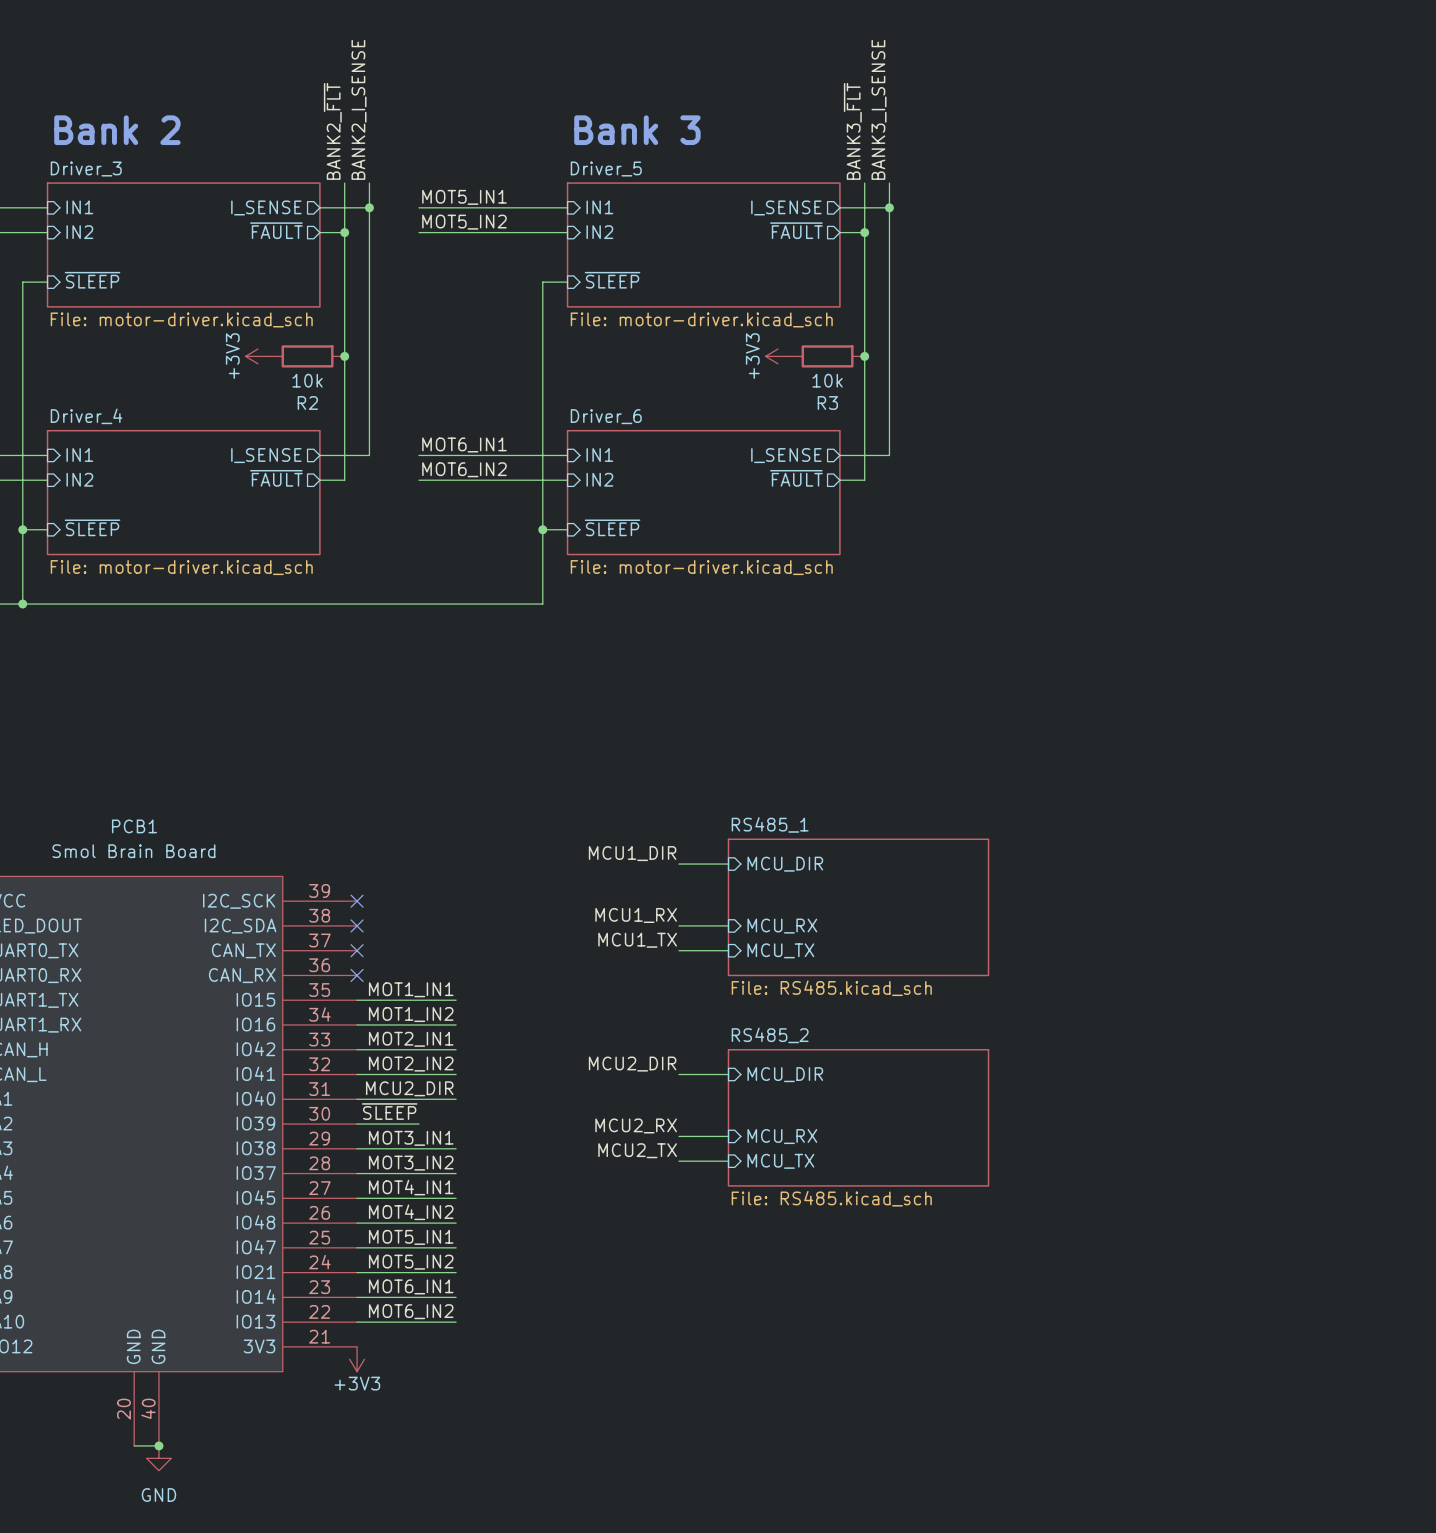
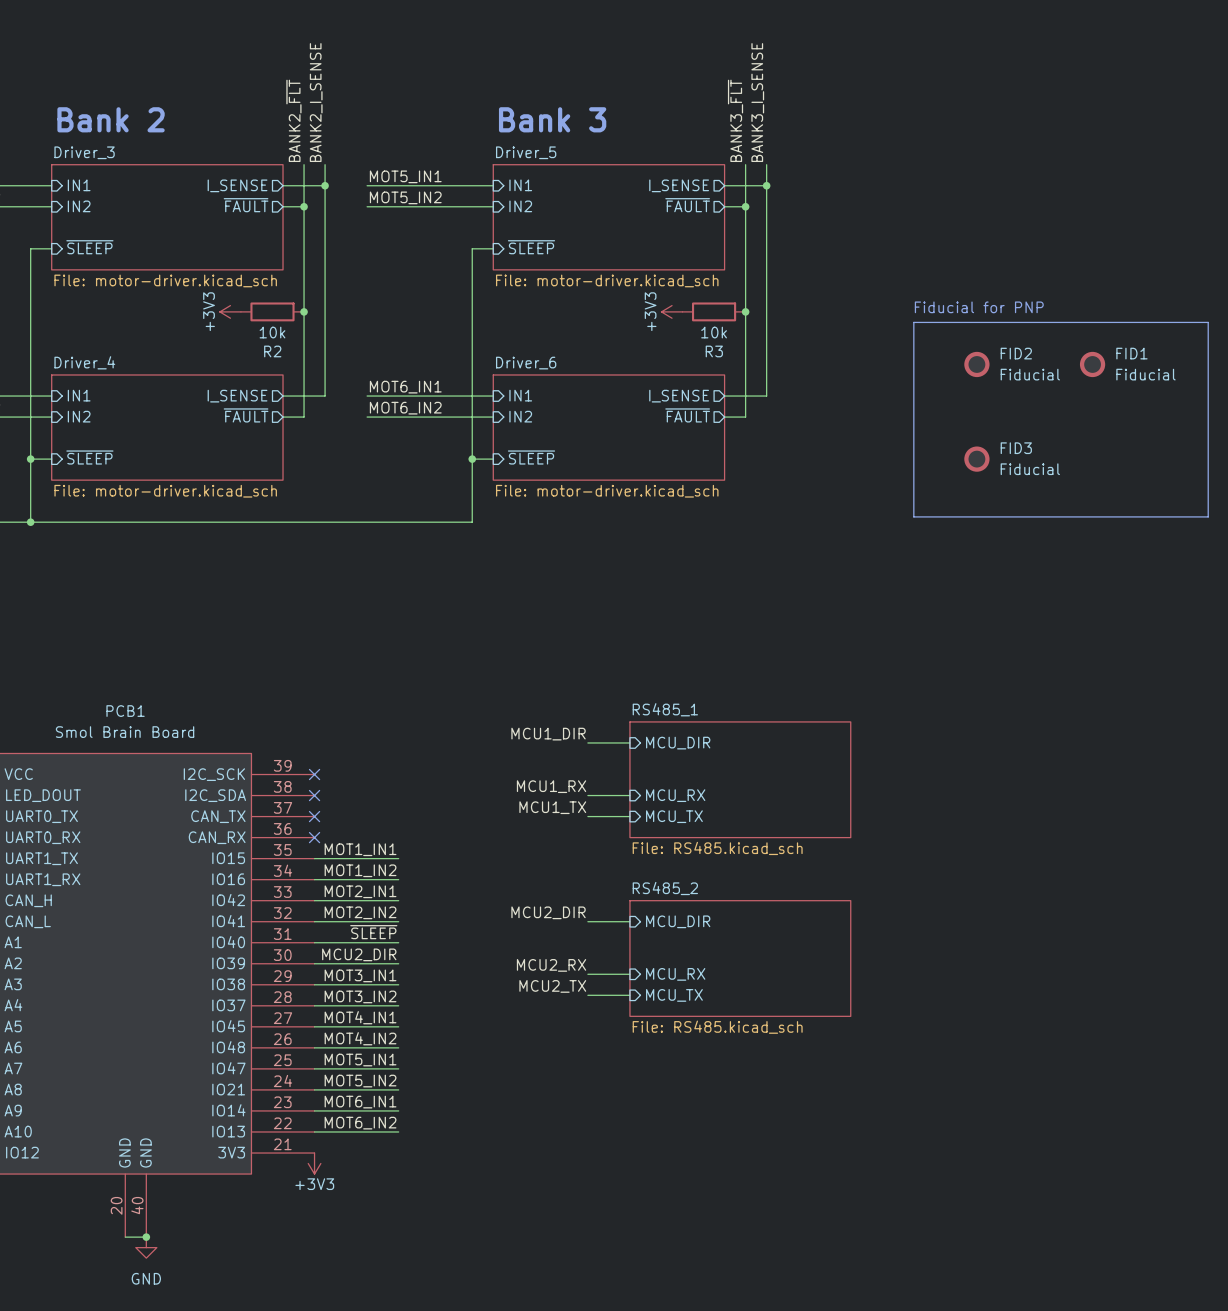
text: none -> Fiducial for PNP (979, 307)
line: none -> (913, 322) (1208, 322) (1208, 516) (913, 516) (913, 322)
FID2: none -> Fiducial (976, 364)
FID1: none -> Fiducial (1092, 364)
FID3: none -> Fiducial (976, 459)
label: MCU2_DIR (409, 1088) -> ~{SLEEP} (373, 932)
label: ~{SLEEP} (389, 1111) -> none
label: none -> MCU2_DIR (359, 954)
wire: none -> (367, 963) (398, 963)

